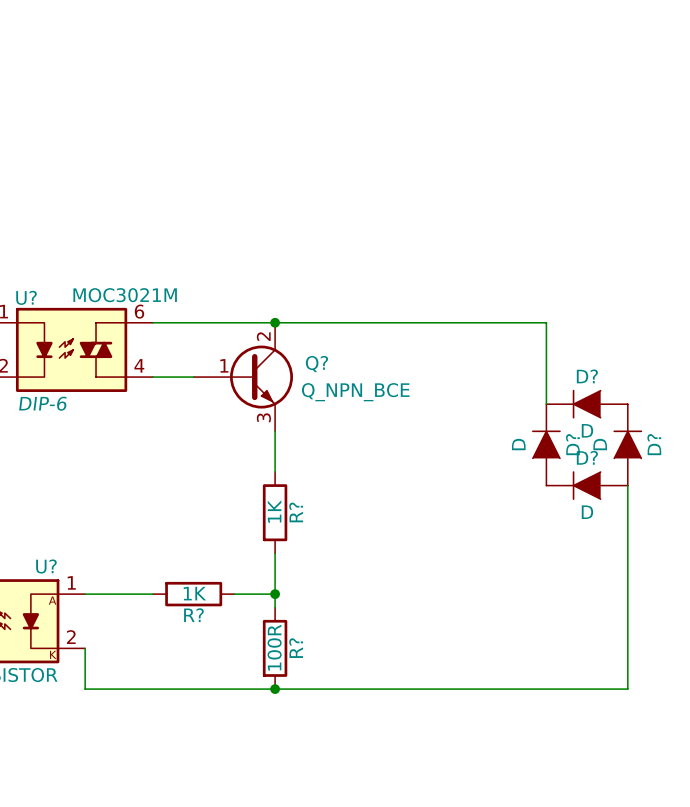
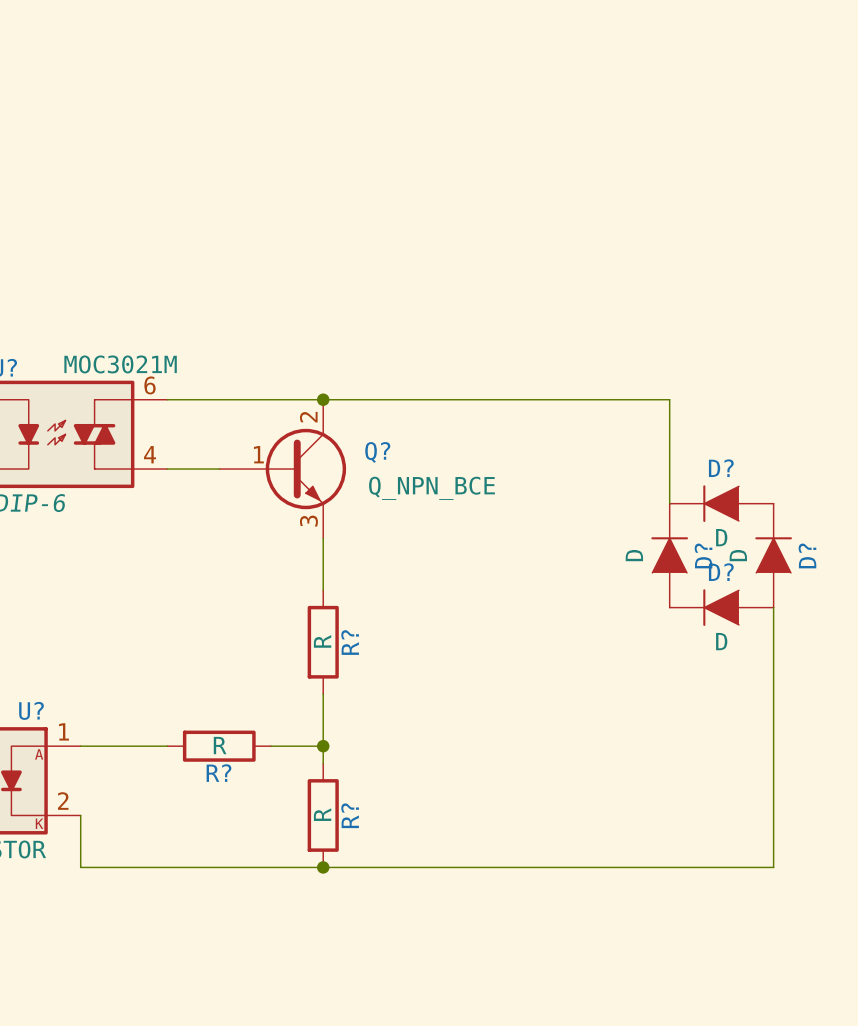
R? value: 1K (274, 511) -> R (322, 641)
R? value: 1K (194, 593) -> R (220, 745)
R? value: 100R (274, 647) -> R (322, 814)

